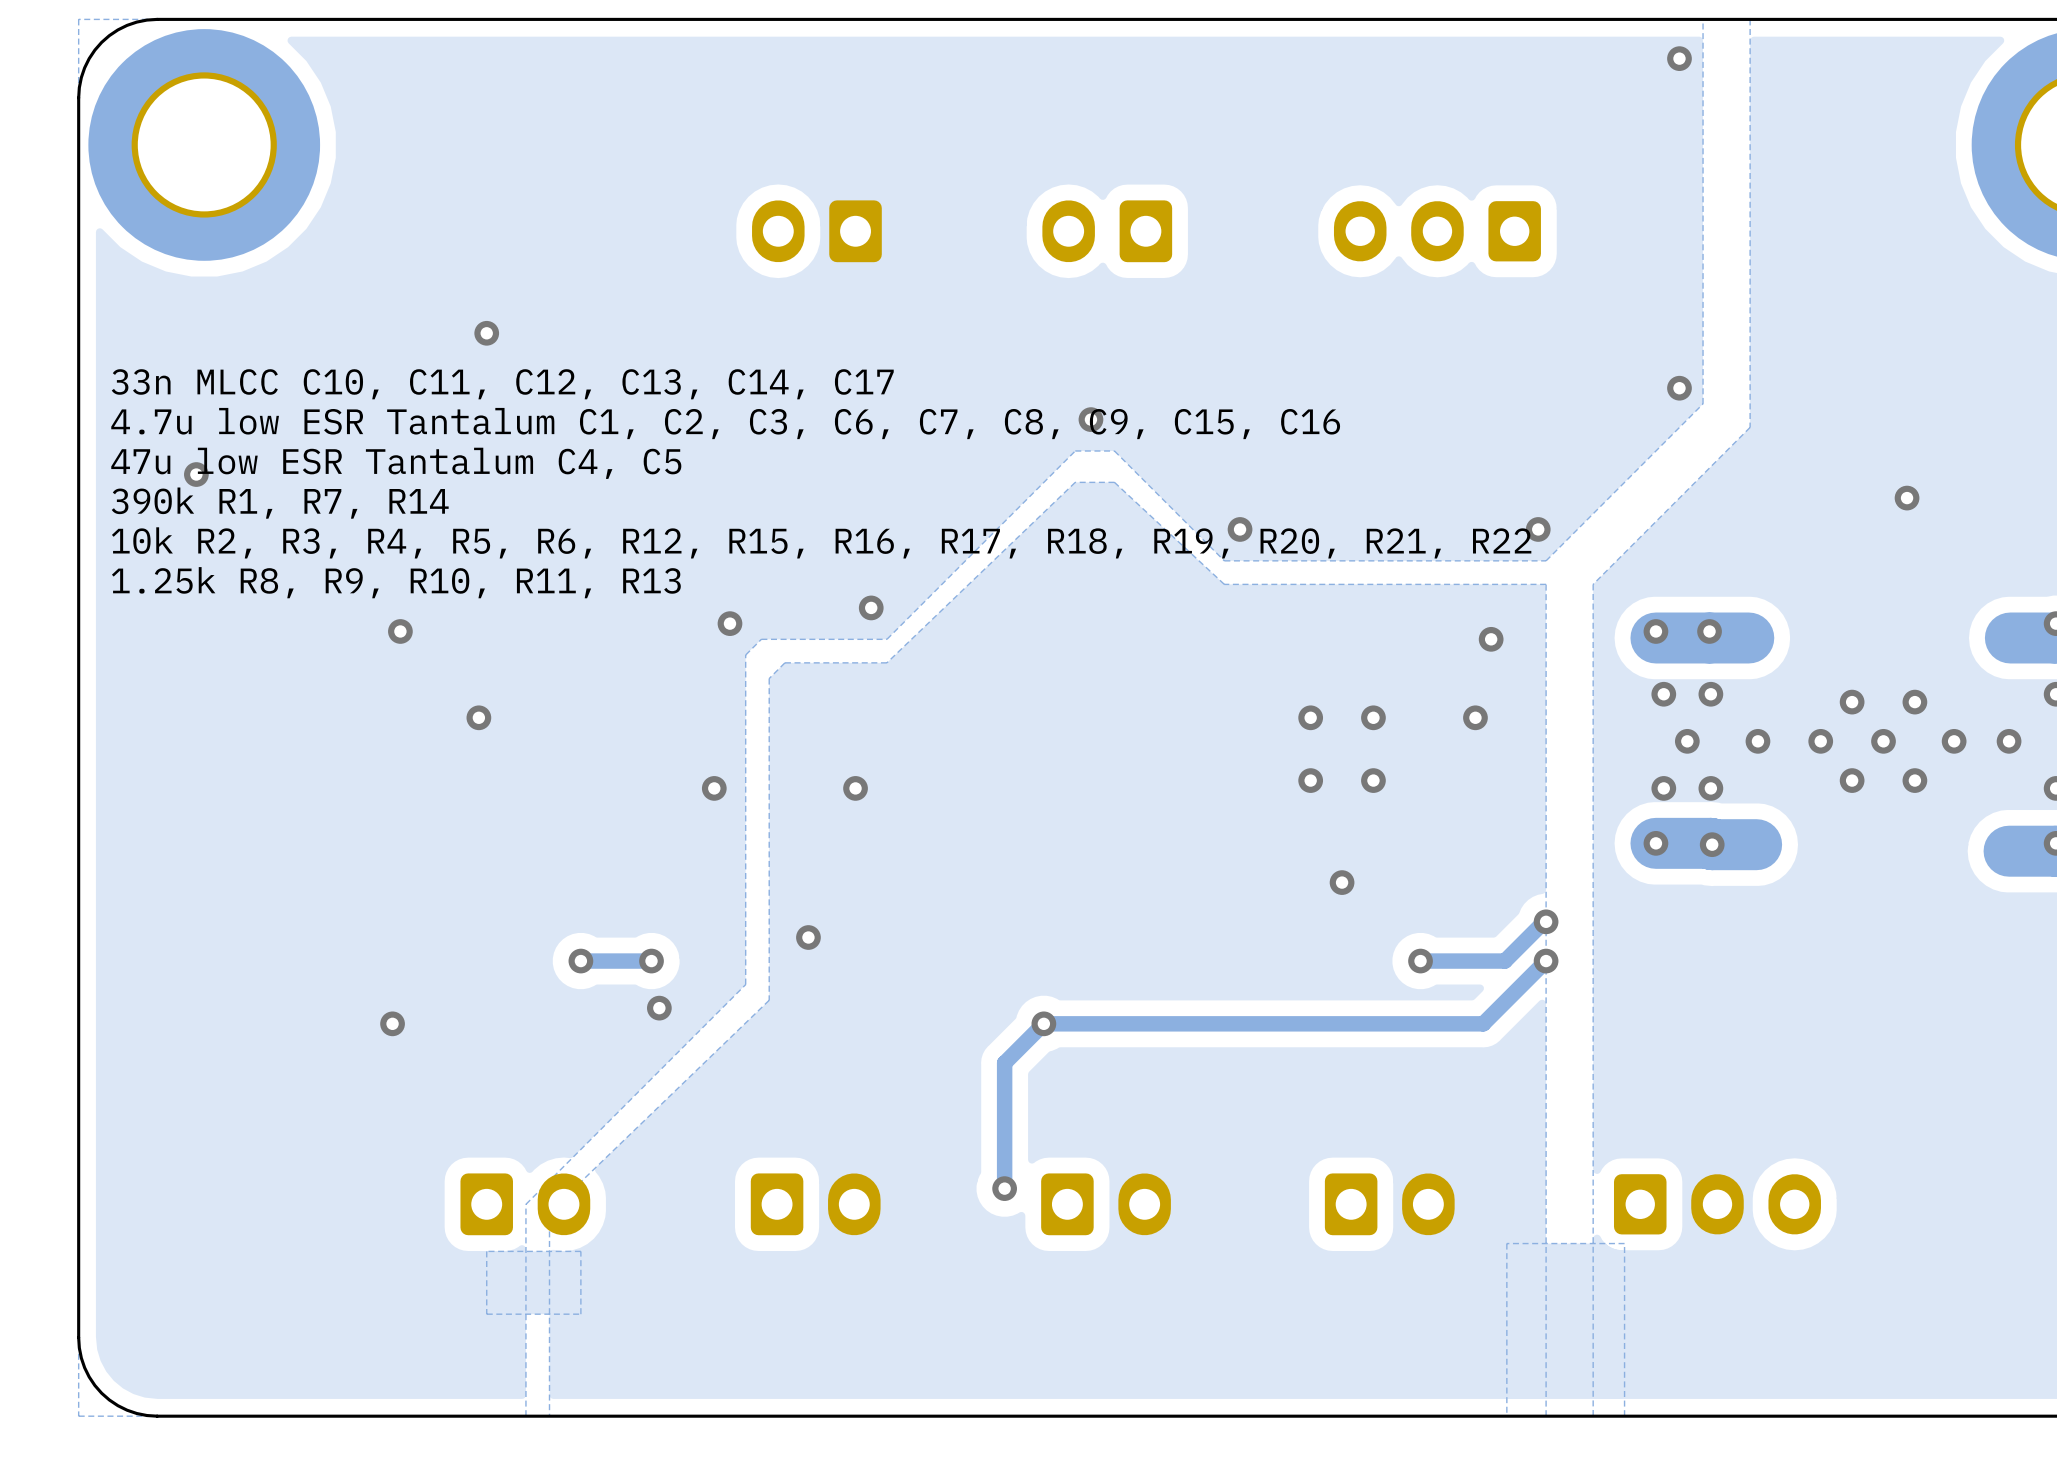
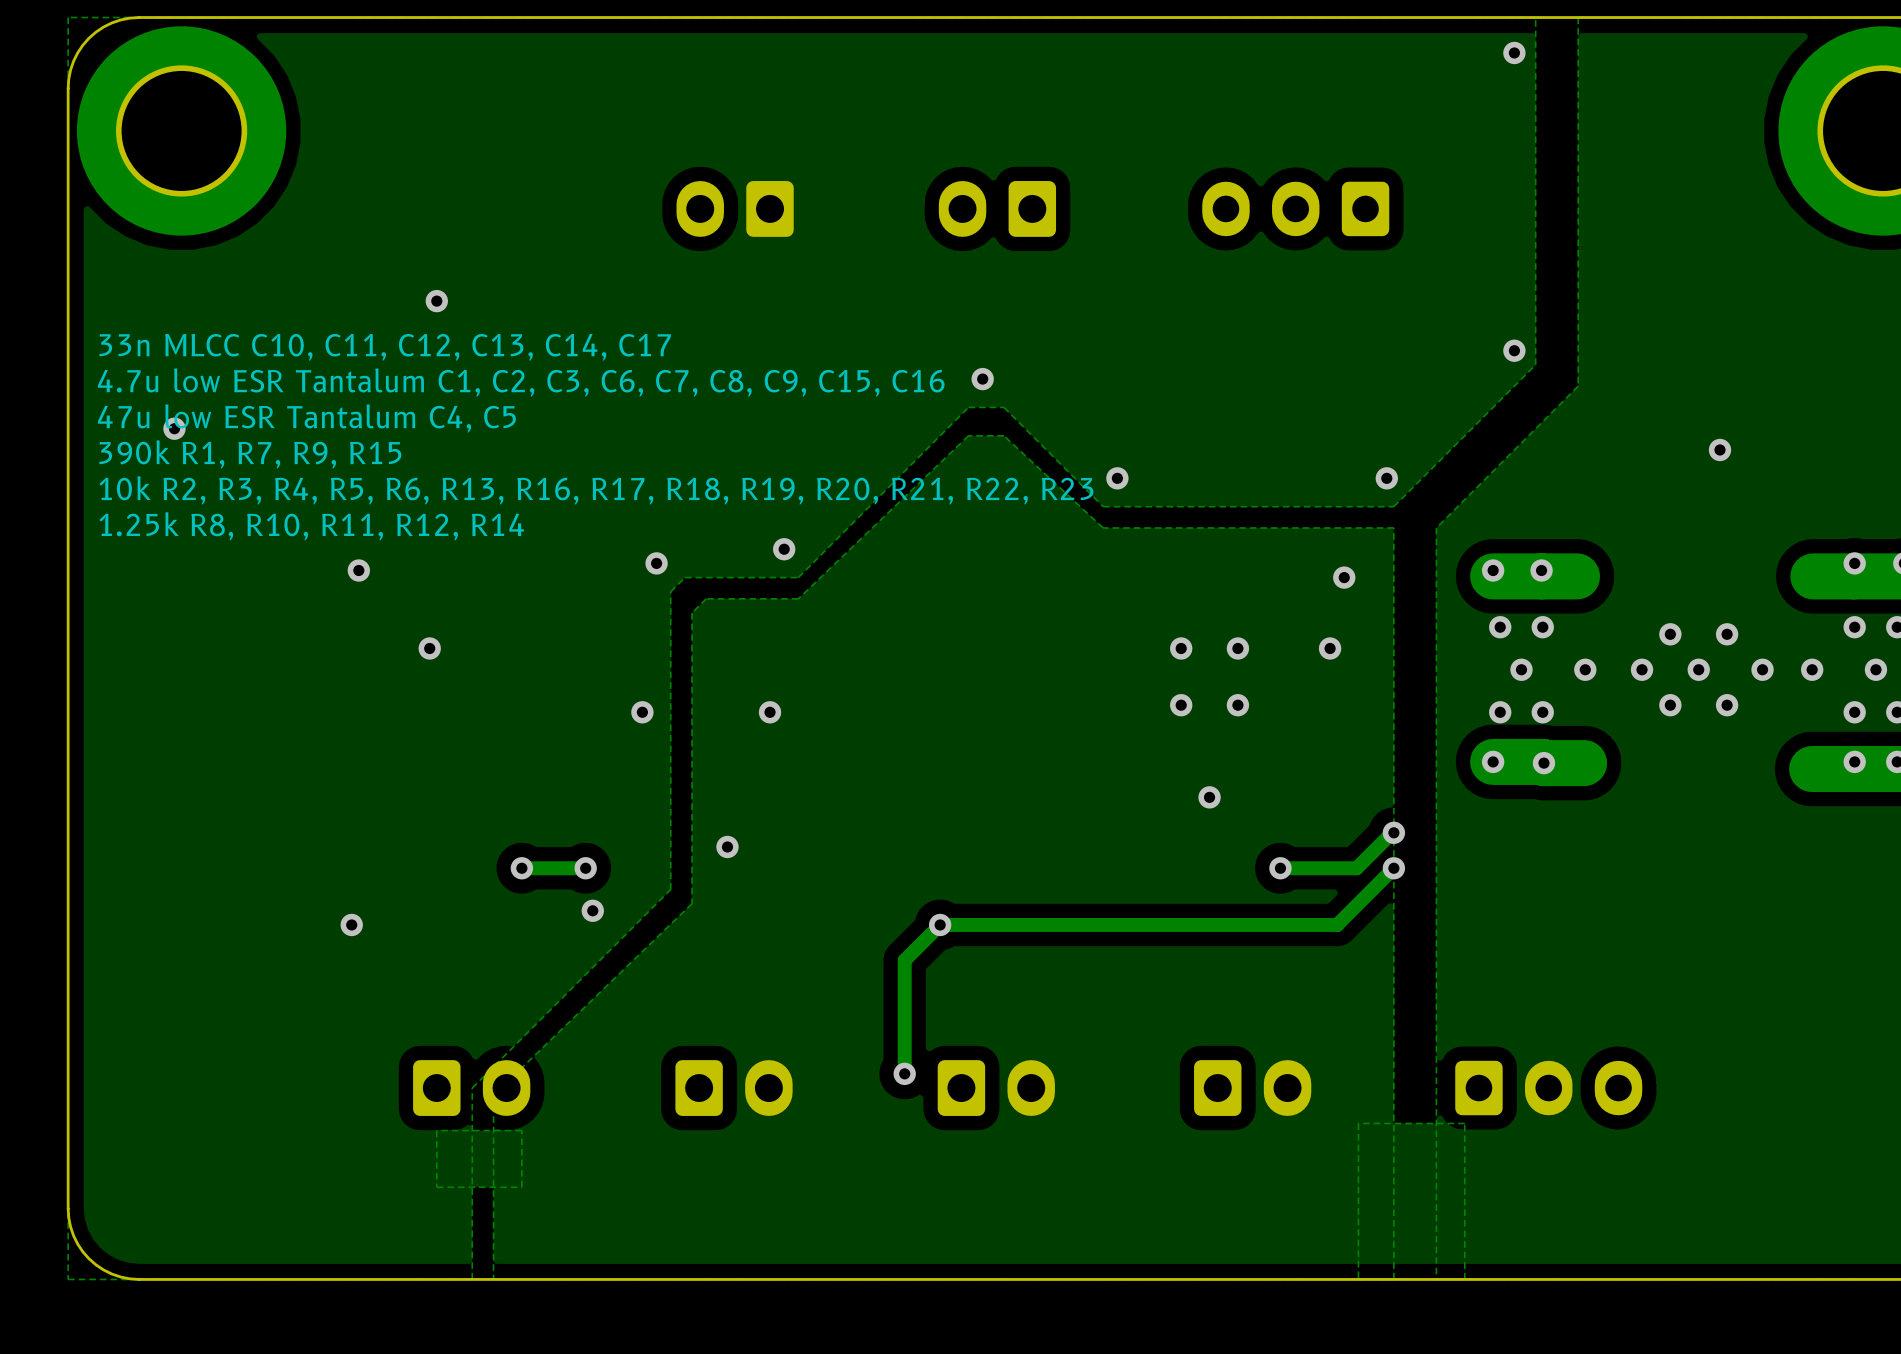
text: 390k R1, R7, R14 (280, 503) -> 390k R1, R7, R9, R15 (250, 454)
text: 10k R2, R3, R4, R5, R6, R12, R15, R16, R17, R18, R19, R20, R21, R22 (821, 542) -> 10k R2, R3, R4, R5, R6, R13, R16, R17, R18, R19, R20, R21, R22, R23 (596, 490)
text: 1.25k R8, R9, R10, R11, R13 (396, 582) -> 1.25k R8, R10, R11, R12, R14 (311, 526)

